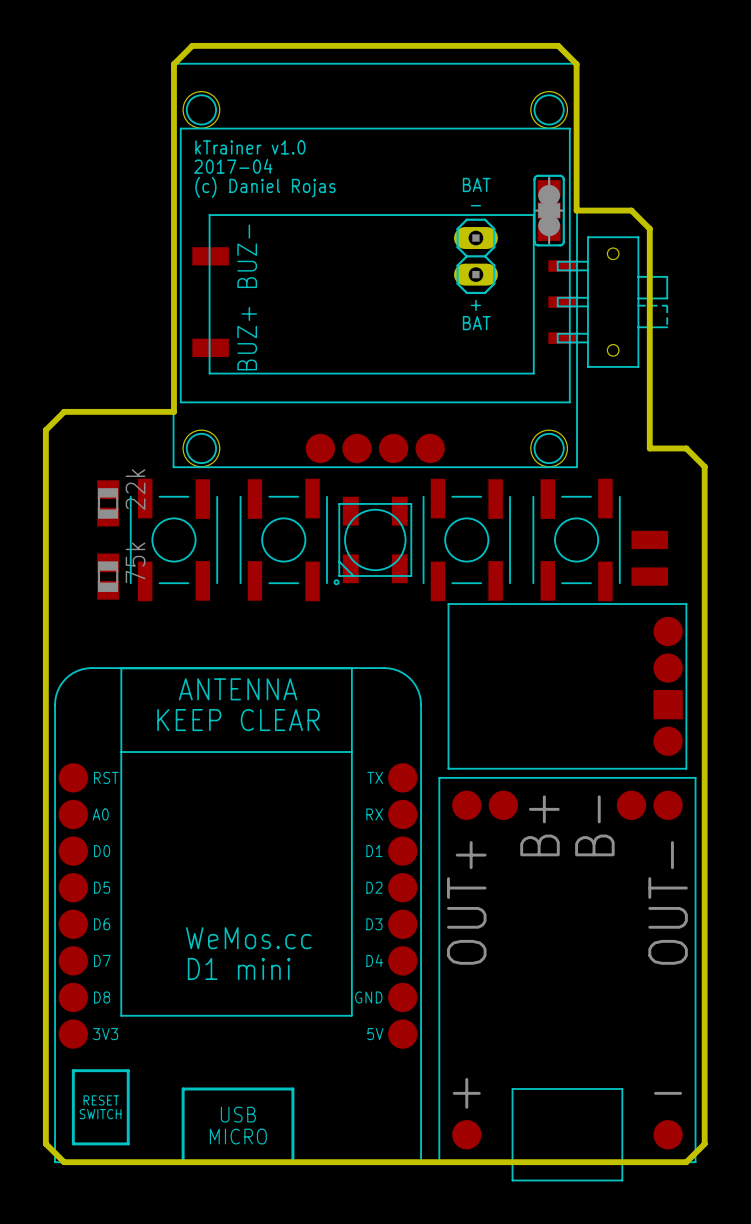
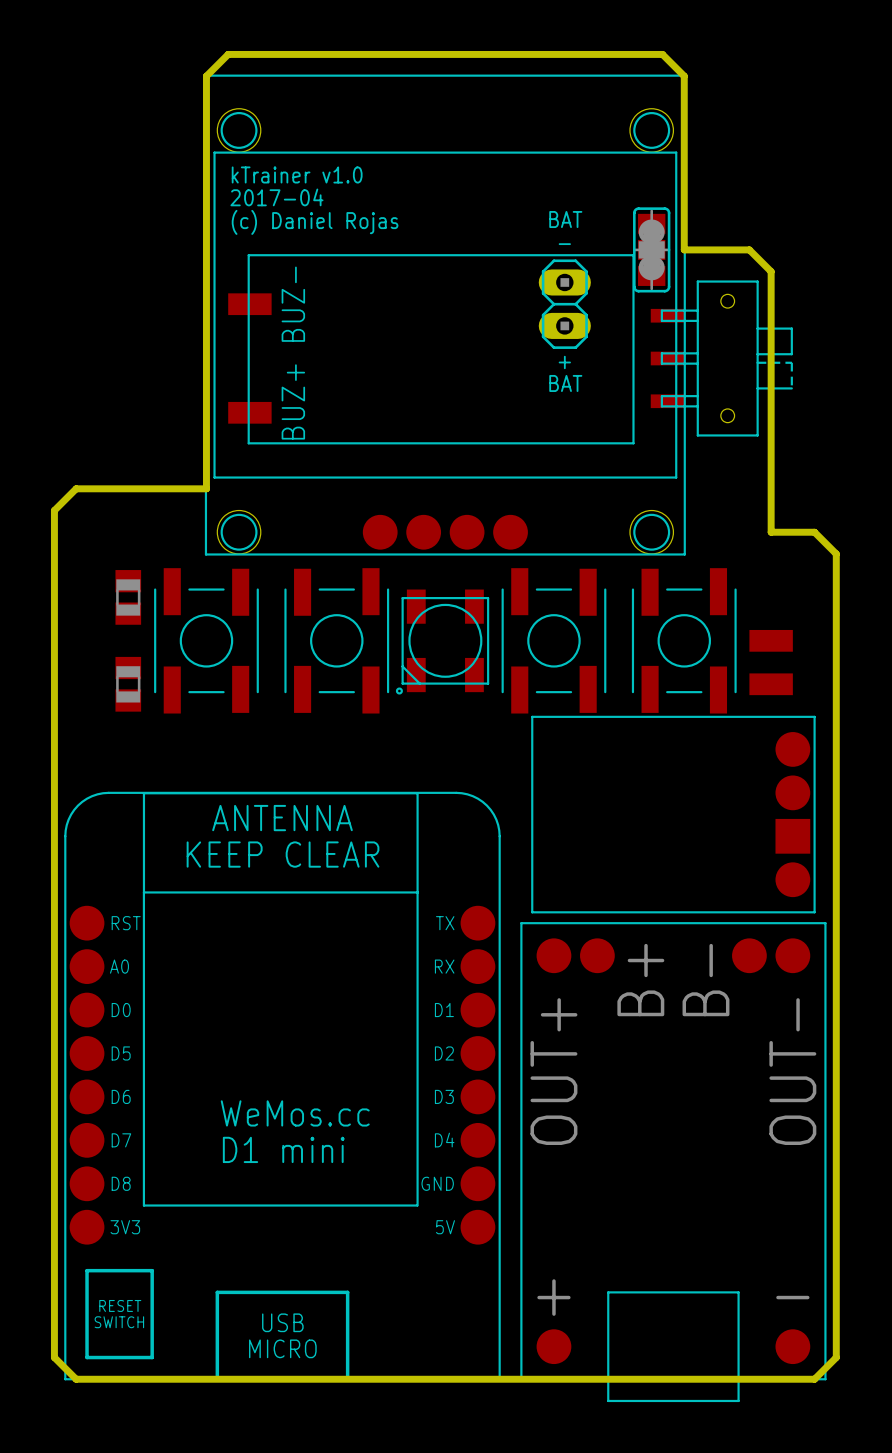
part value: 22k (135, 489) -> none
part value: 75k (135, 562) -> none

